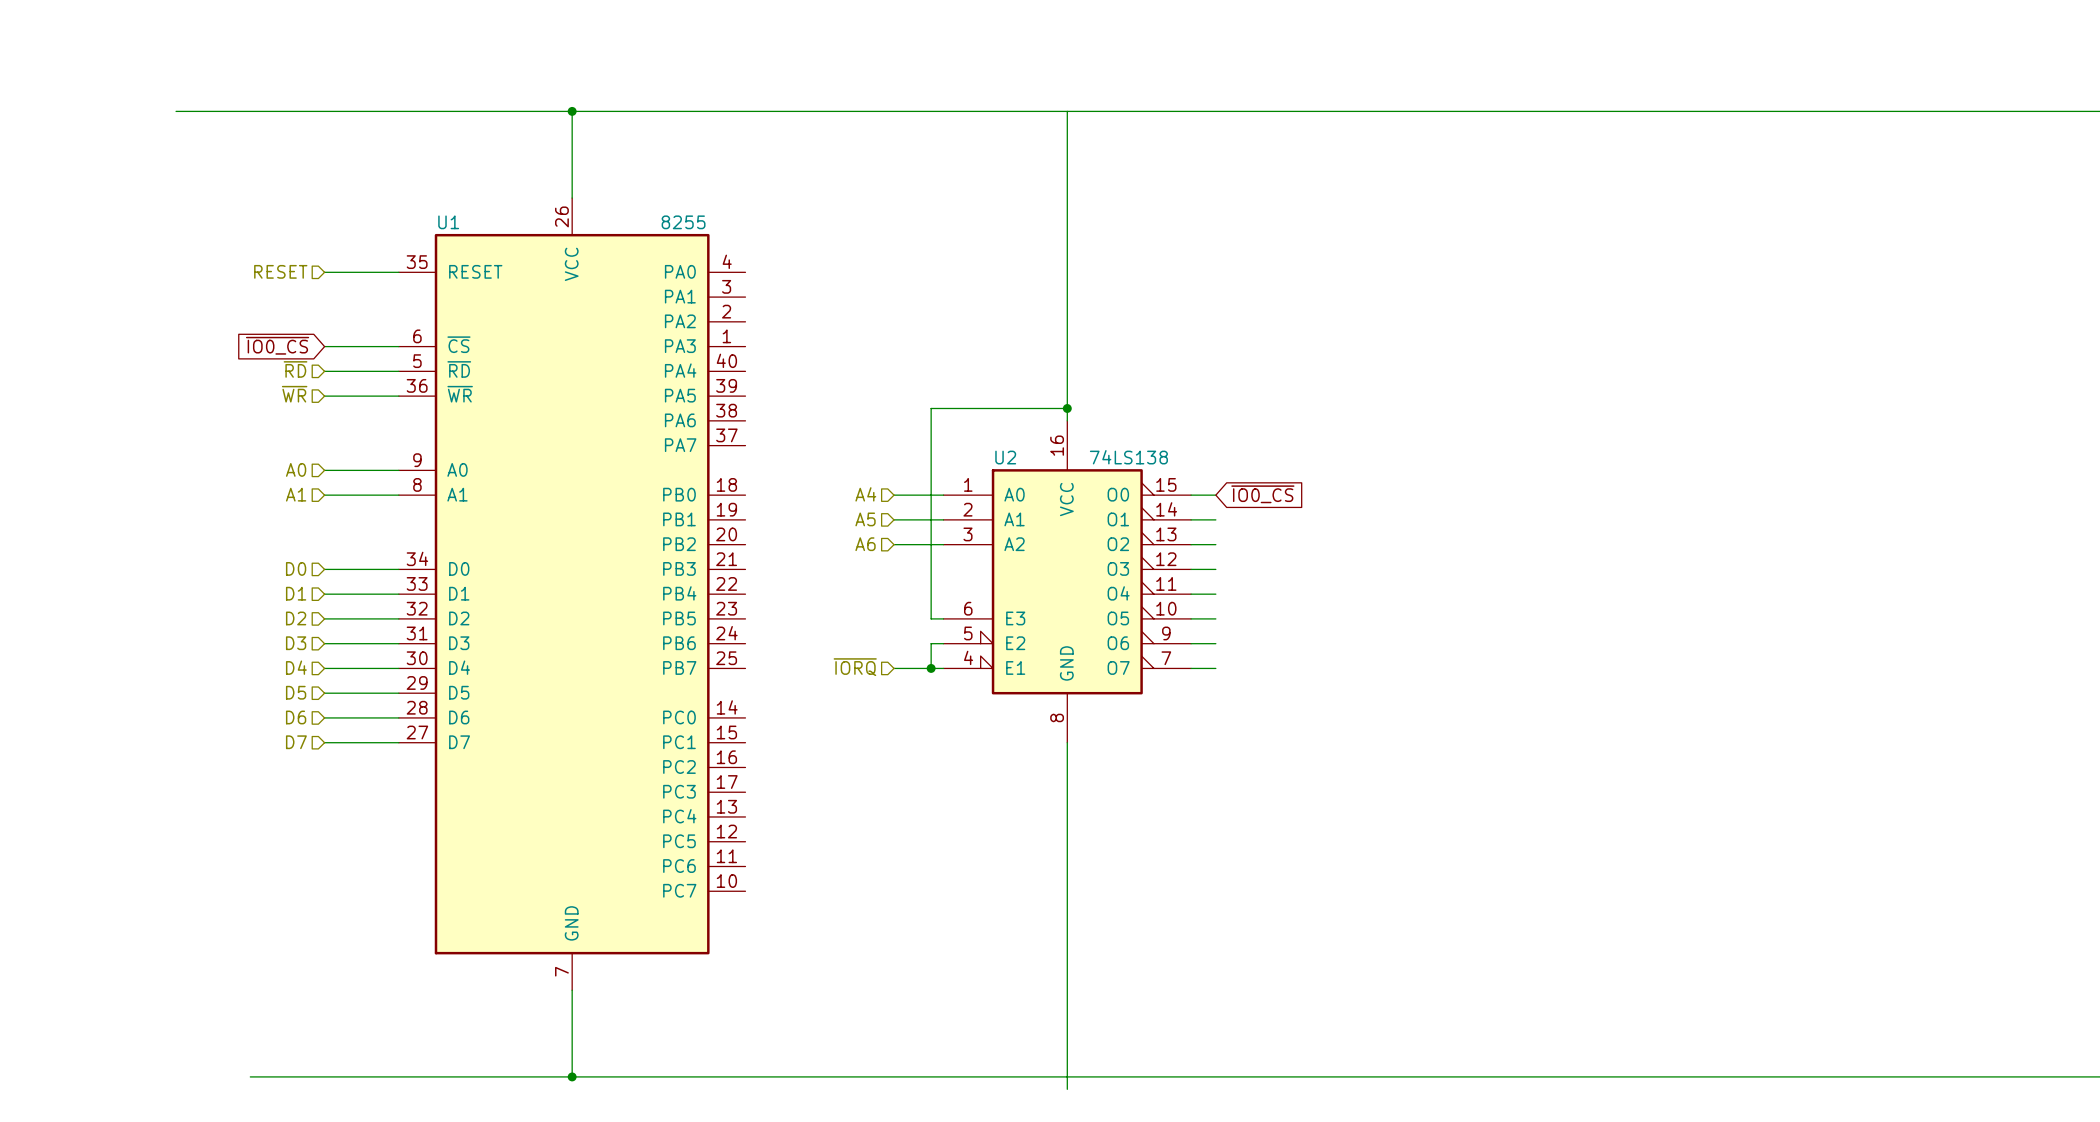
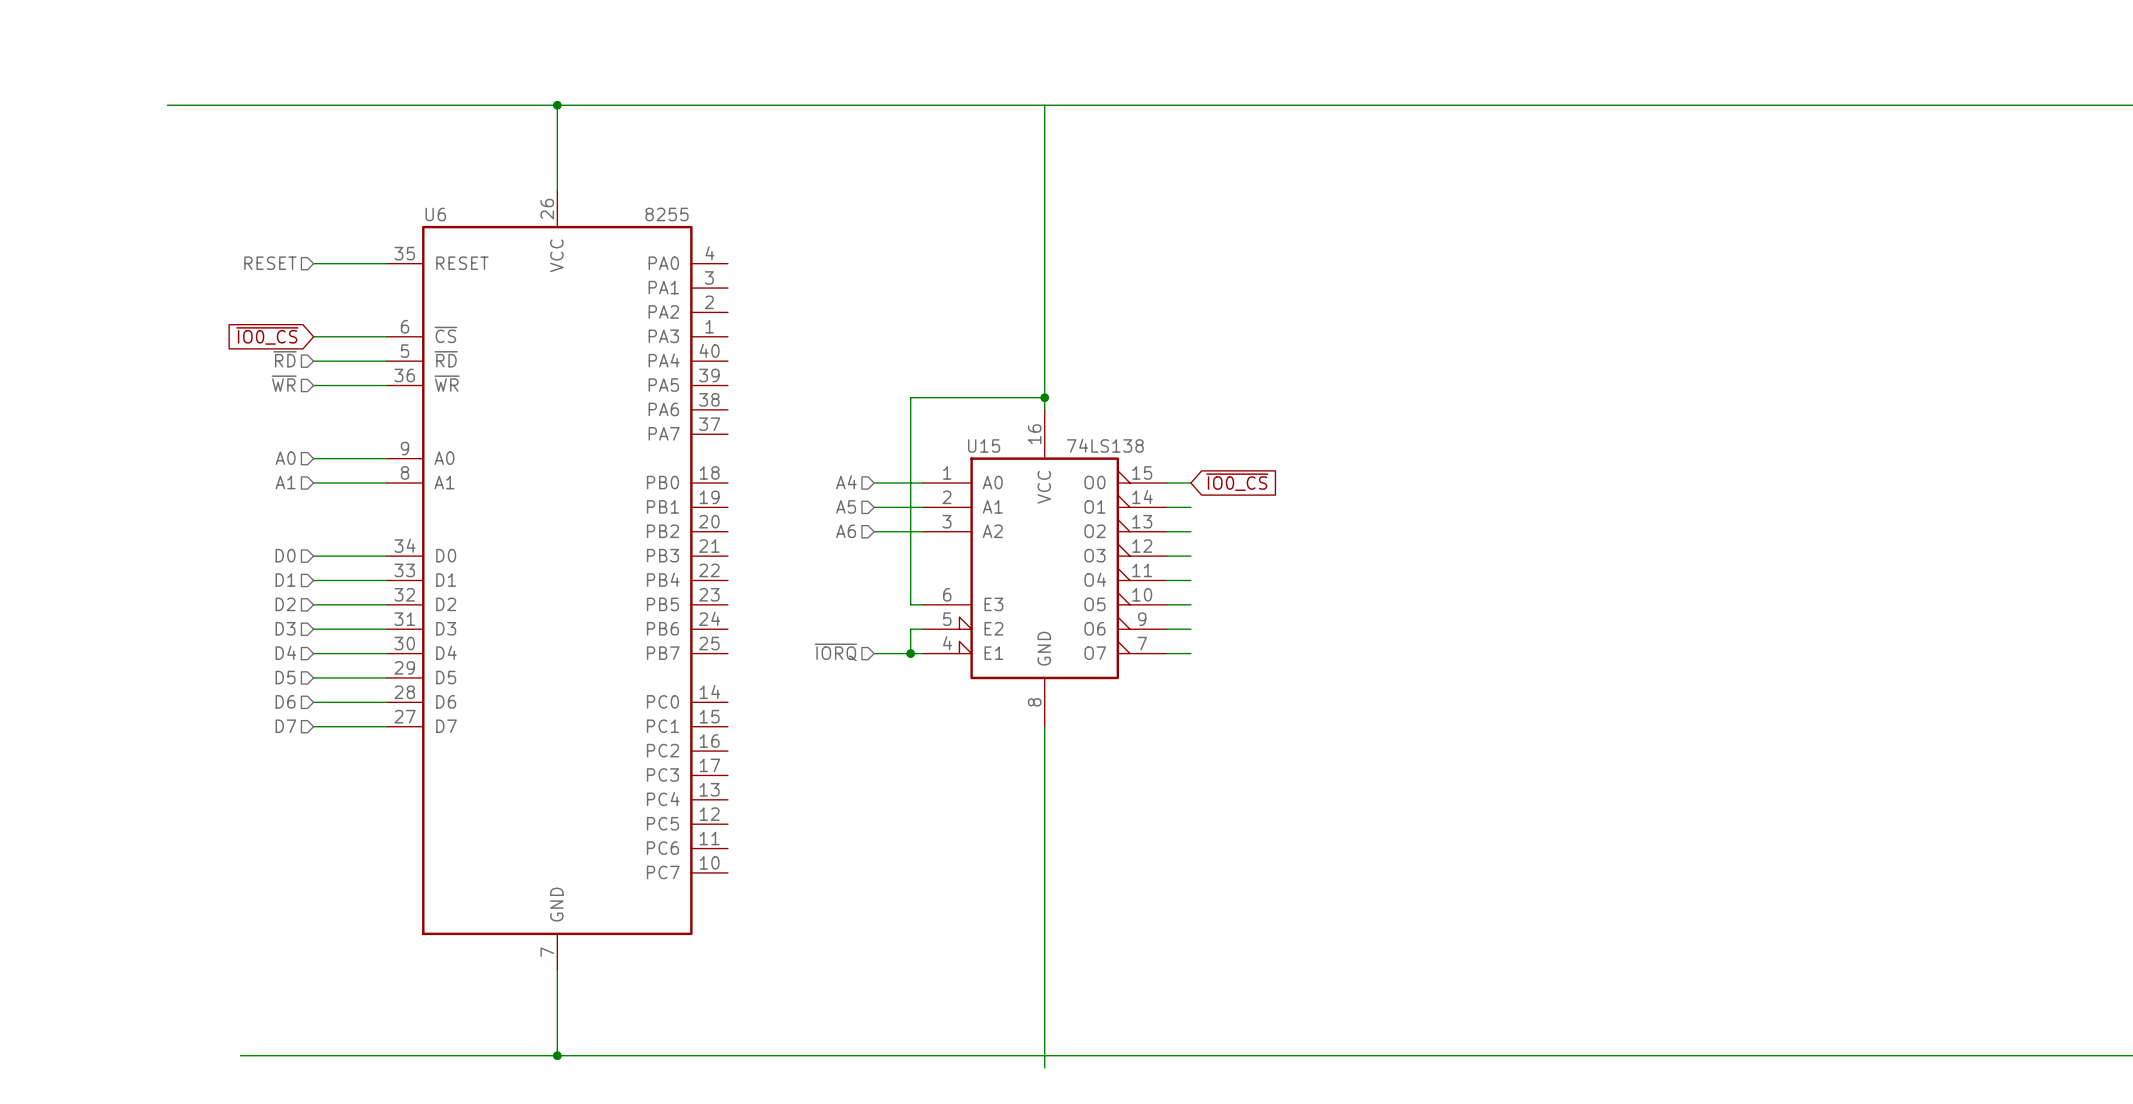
U1 name: U1 (448, 222) -> U6 (435, 214)
U2 name: U2 (1005, 457) -> U15 (984, 445)

